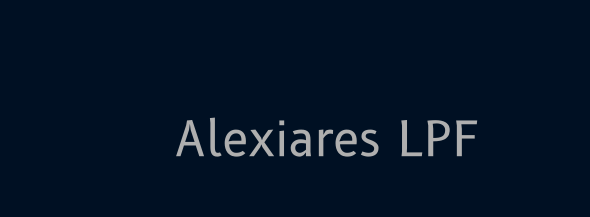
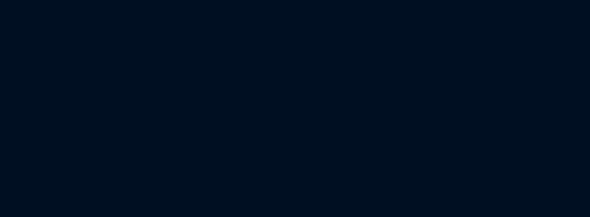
text: Alexiares LPF (326, 137) -> none

